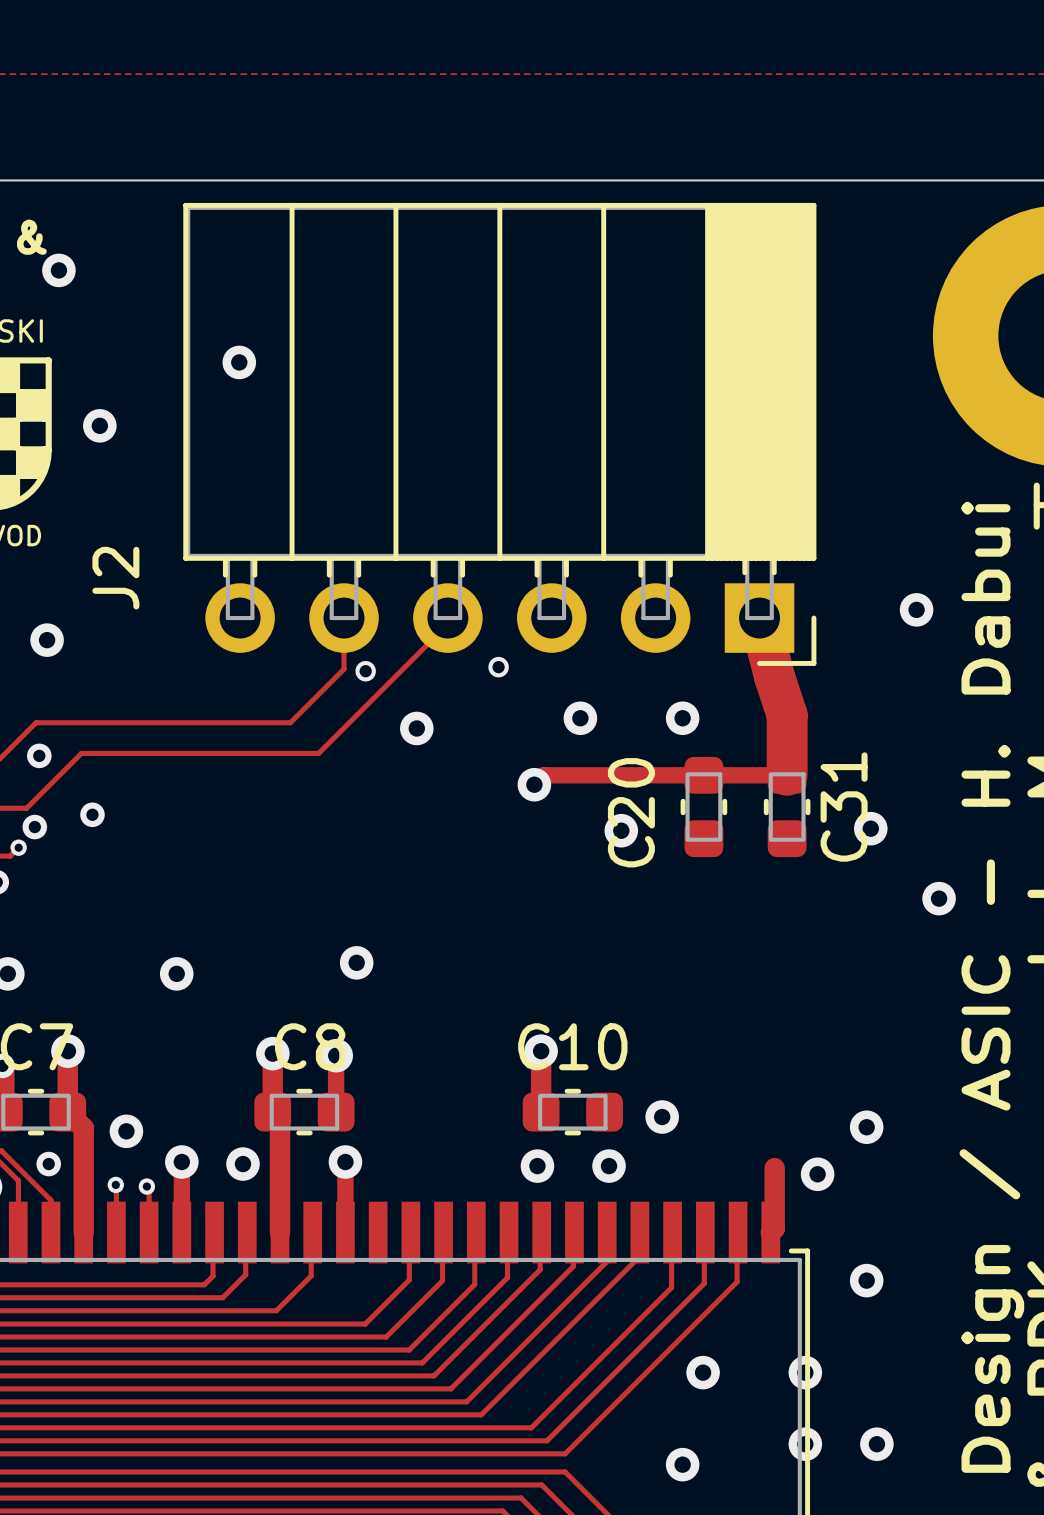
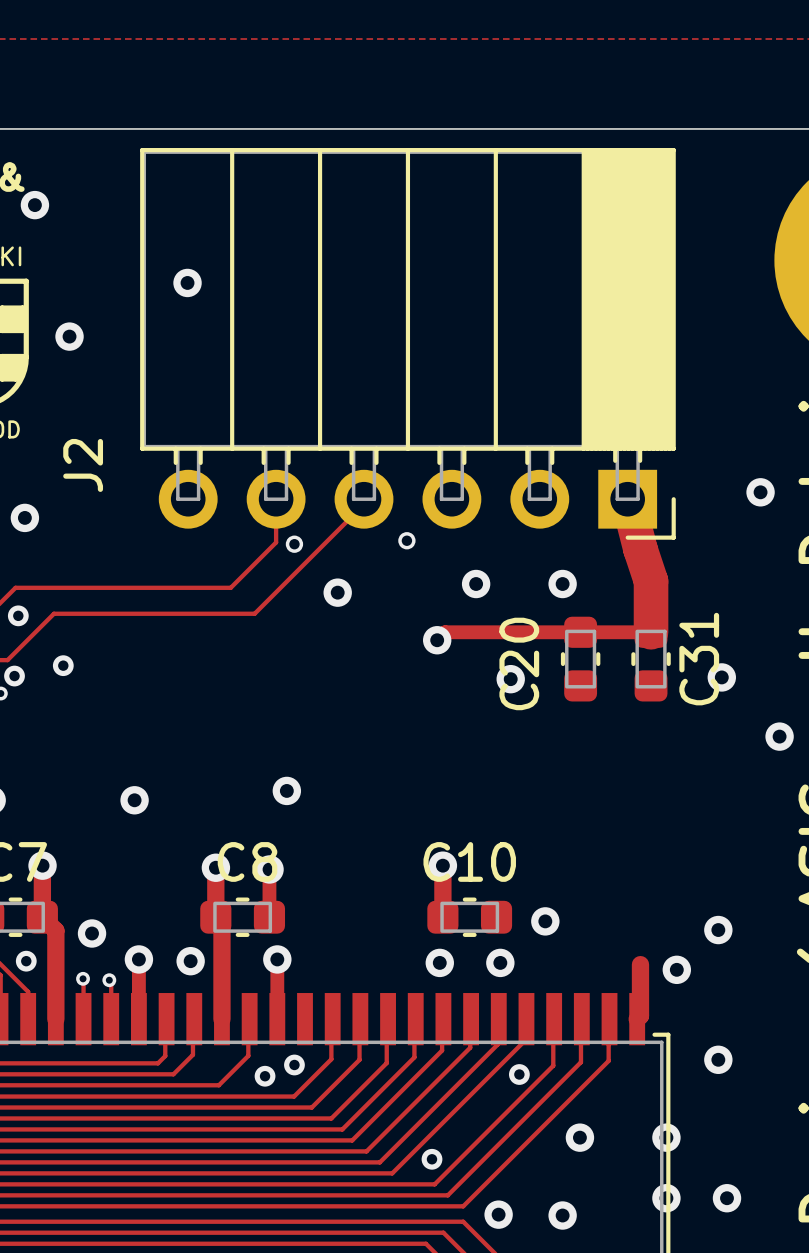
via: none -> (294, 1064)
via: none -> (519, 1074)
via: none -> (265, 1076)
via: none -> (432, 1159)
via: none -> (498, 1214)

